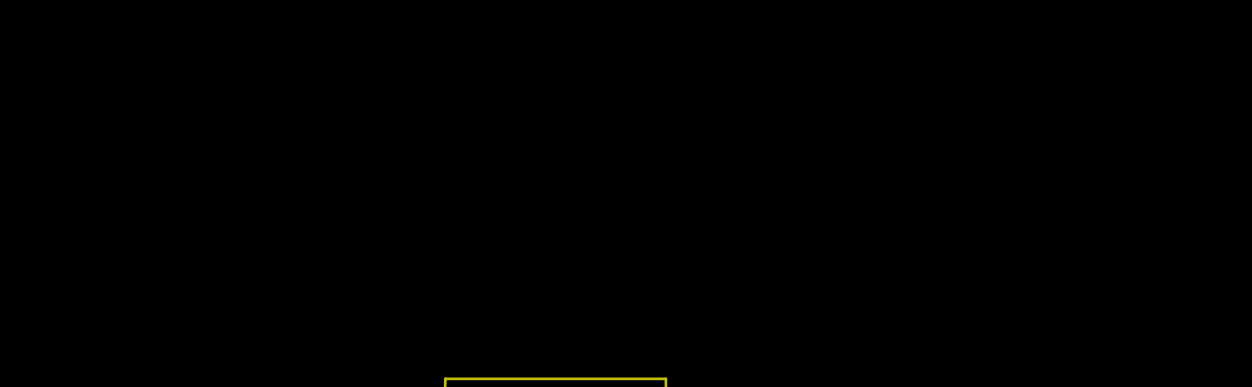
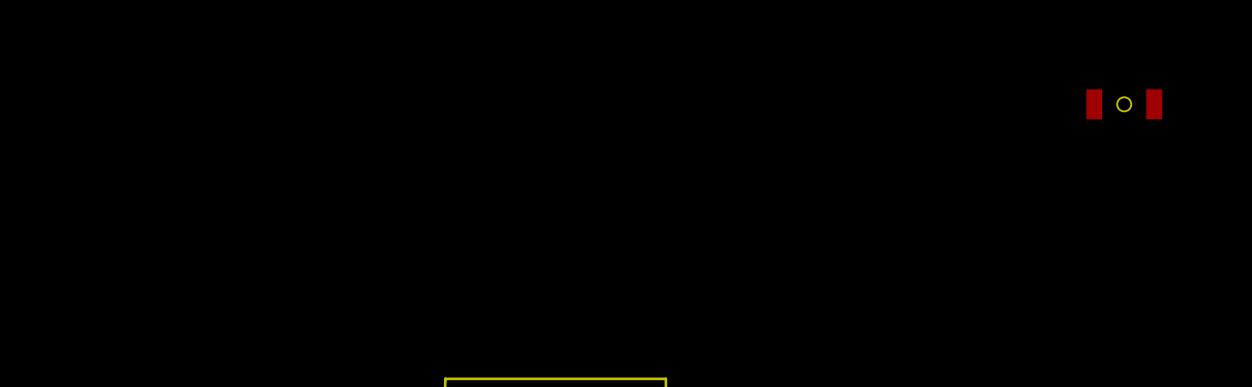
part: none -> (1124, 104)

